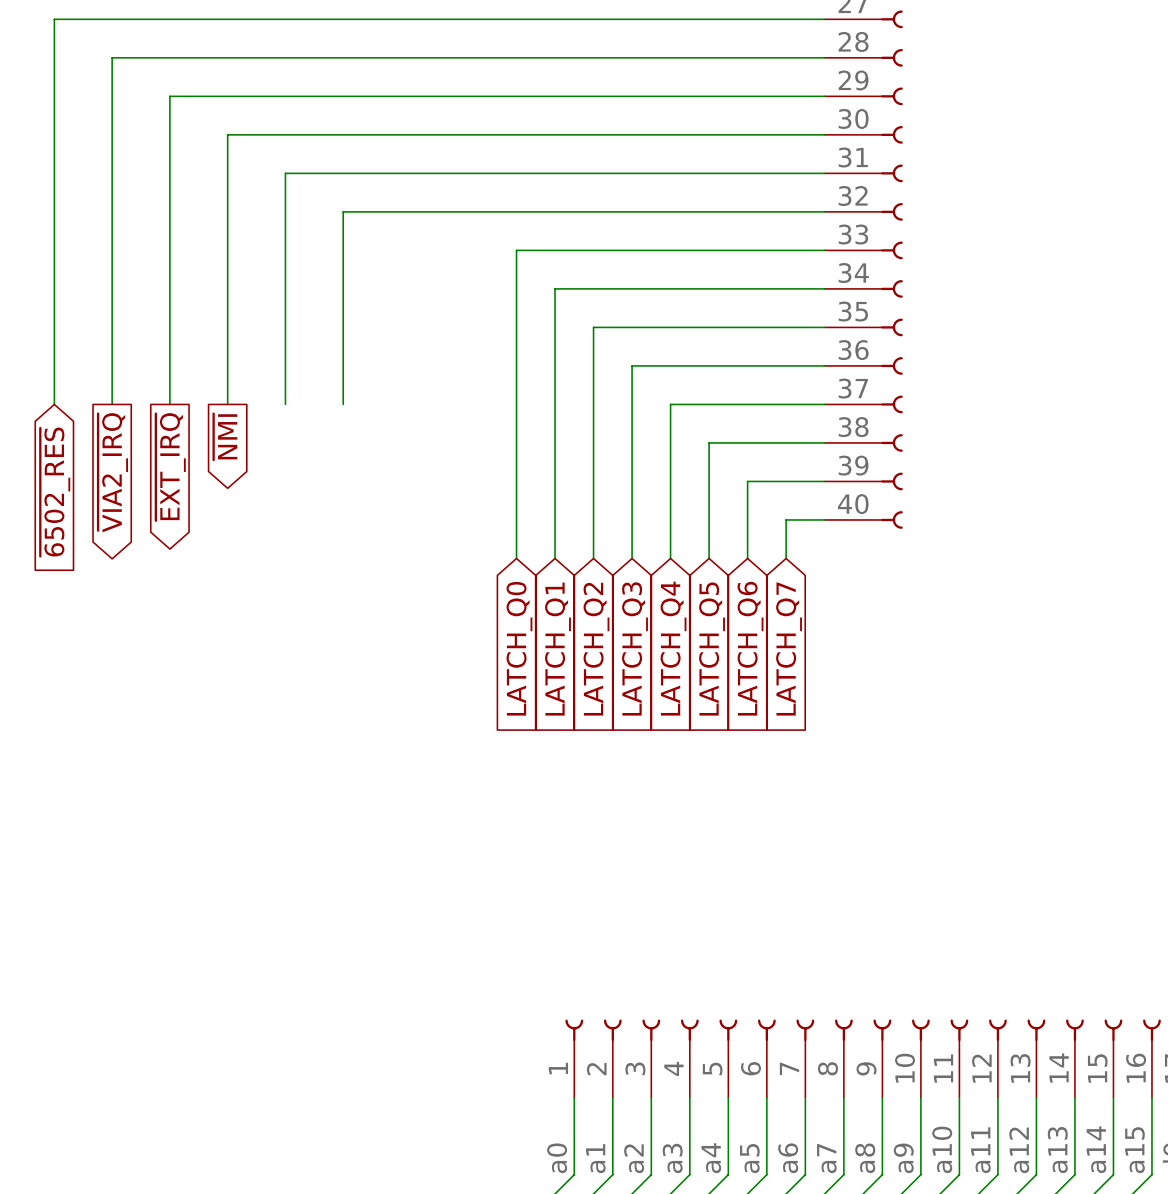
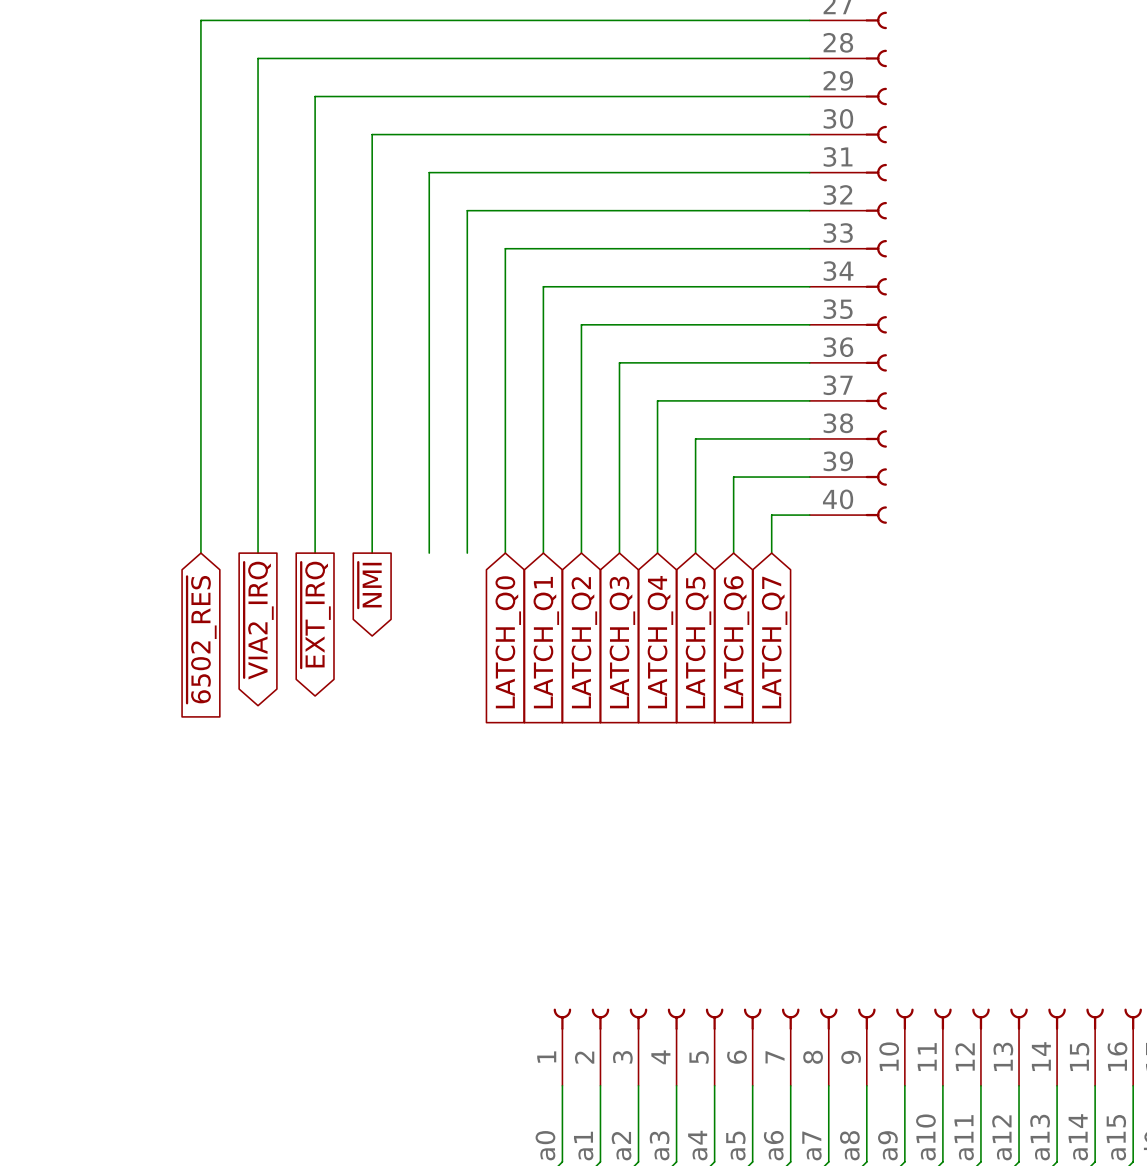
wire: (208, 19) (54, 19) (54, 404) -> (200, 20) (200, 553)
wire: (266, 57) (112, 57) (112, 404) -> (258, 58) (258, 553)
wire: (323, 96) (169, 96) (169, 404) -> (315, 96) (315, 553)
wire: (381, 134) (227, 134) (227, 404) -> (372, 134) (372, 553)
wire: (439, 173) (285, 173) (285, 404) -> (429, 172) (429, 553)
wire: (478, 211) (343, 211) (343, 404) -> (467, 210) (467, 553)
global label position: ~{NMI} (225, 436) -> ~{NMI} (369, 585)
global label position: ~{EXT_IRQ} (170, 466) -> ~{EXT_IRQ} (315, 614)
global label position: ~{VIA2_IRQ} (113, 472) -> ~{VIA2_IRQ} (258, 620)
global label position: ~{6502_RES} (55, 492) -> ~{6502_RES} (201, 639)

